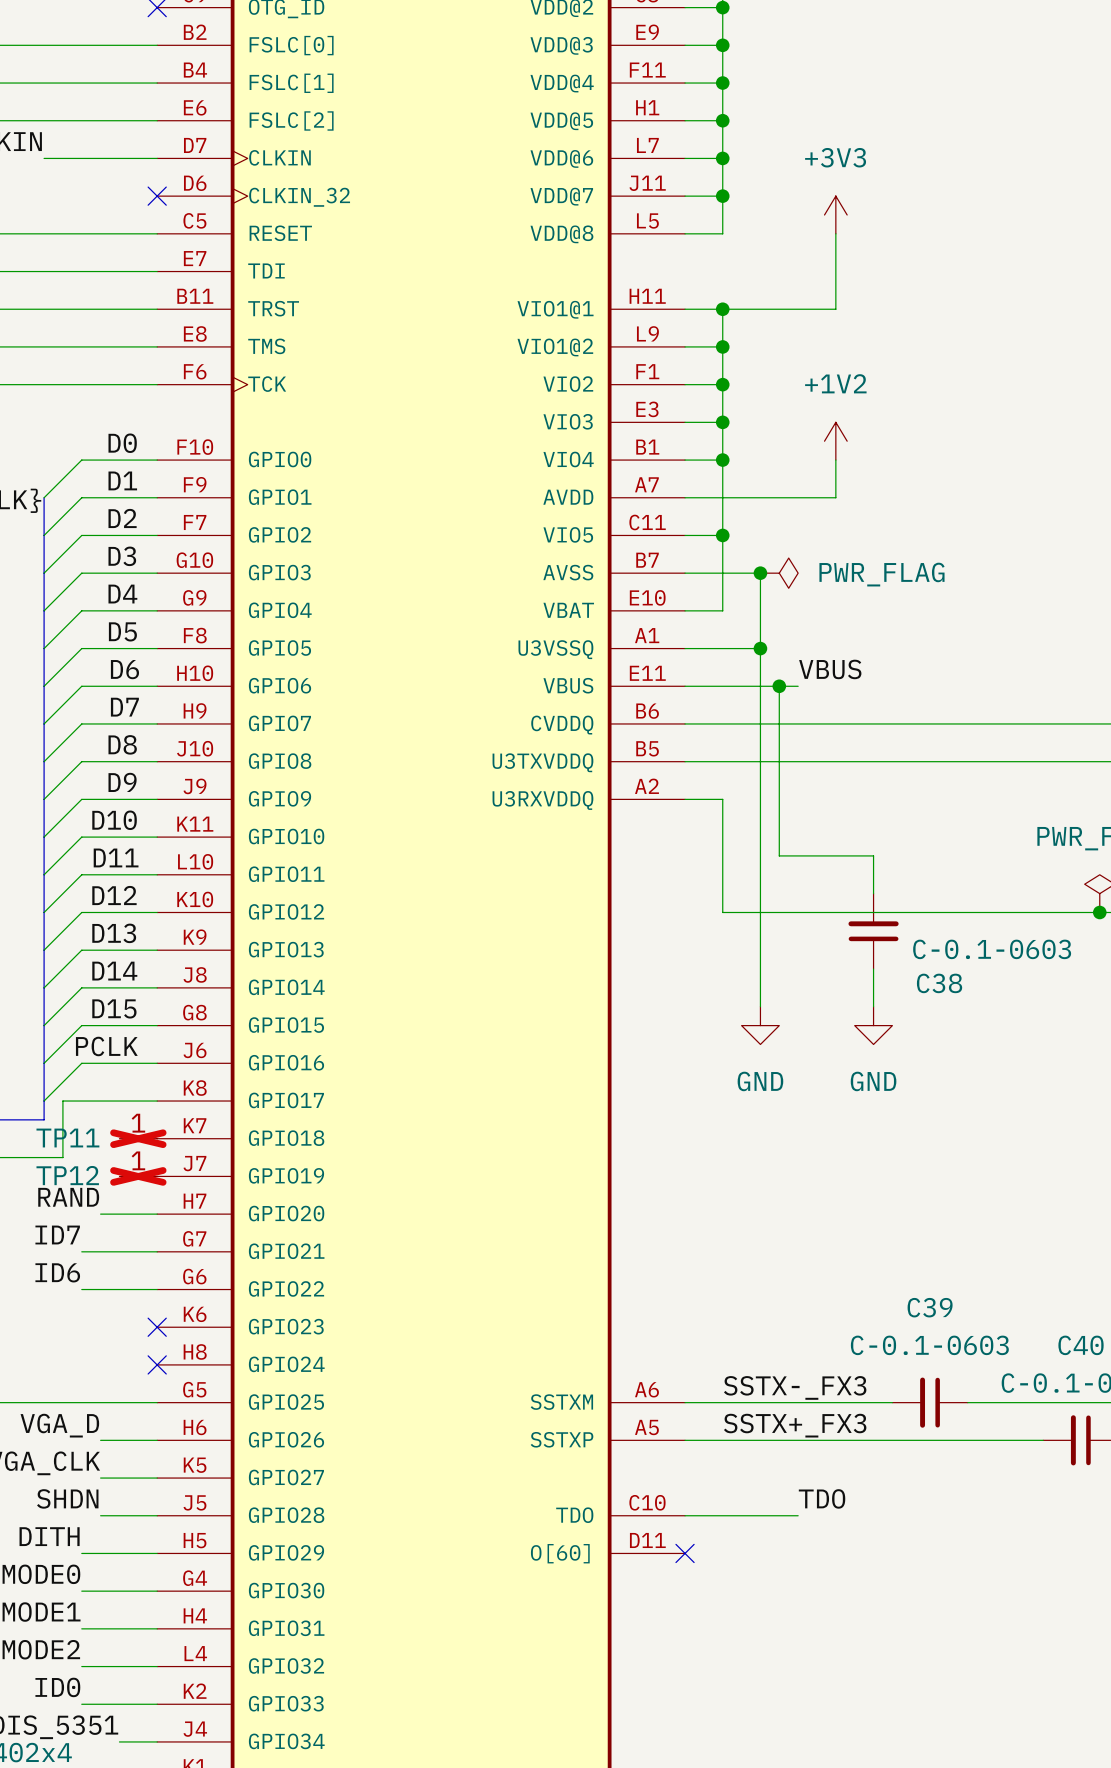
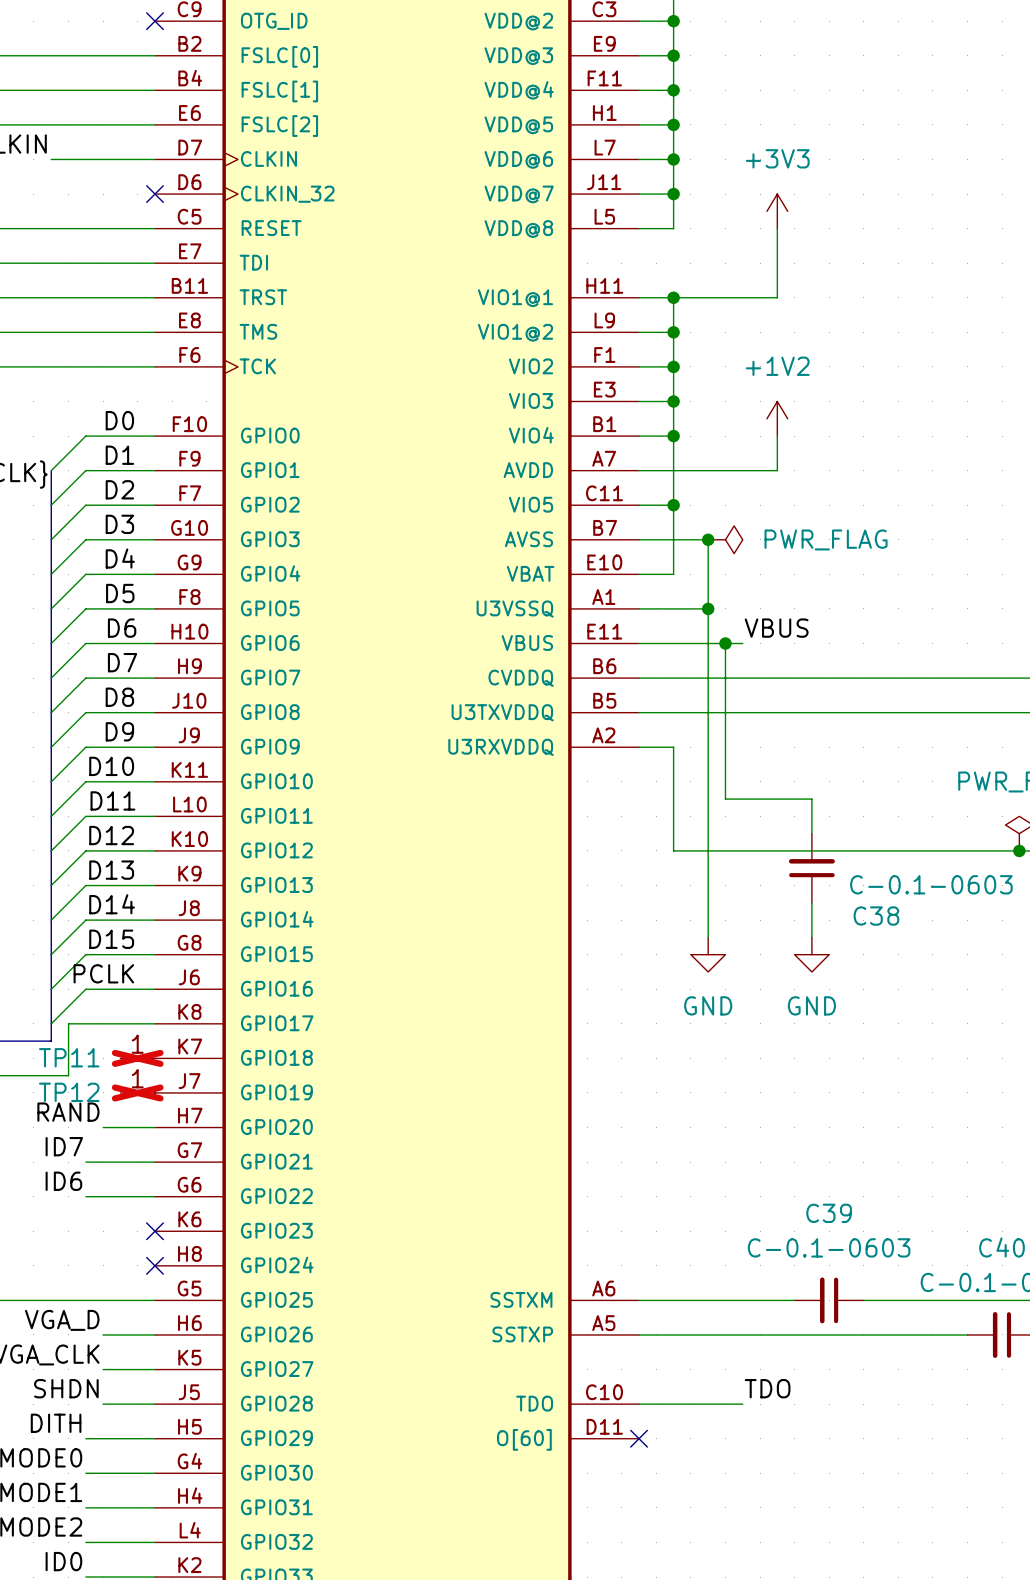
label: SSTX-_FX3 (795, 1387) -> none
C39 position: (930, 1402) -> (829, 1300)
label: SSTX+_FX3 (795, 1425) -> none

